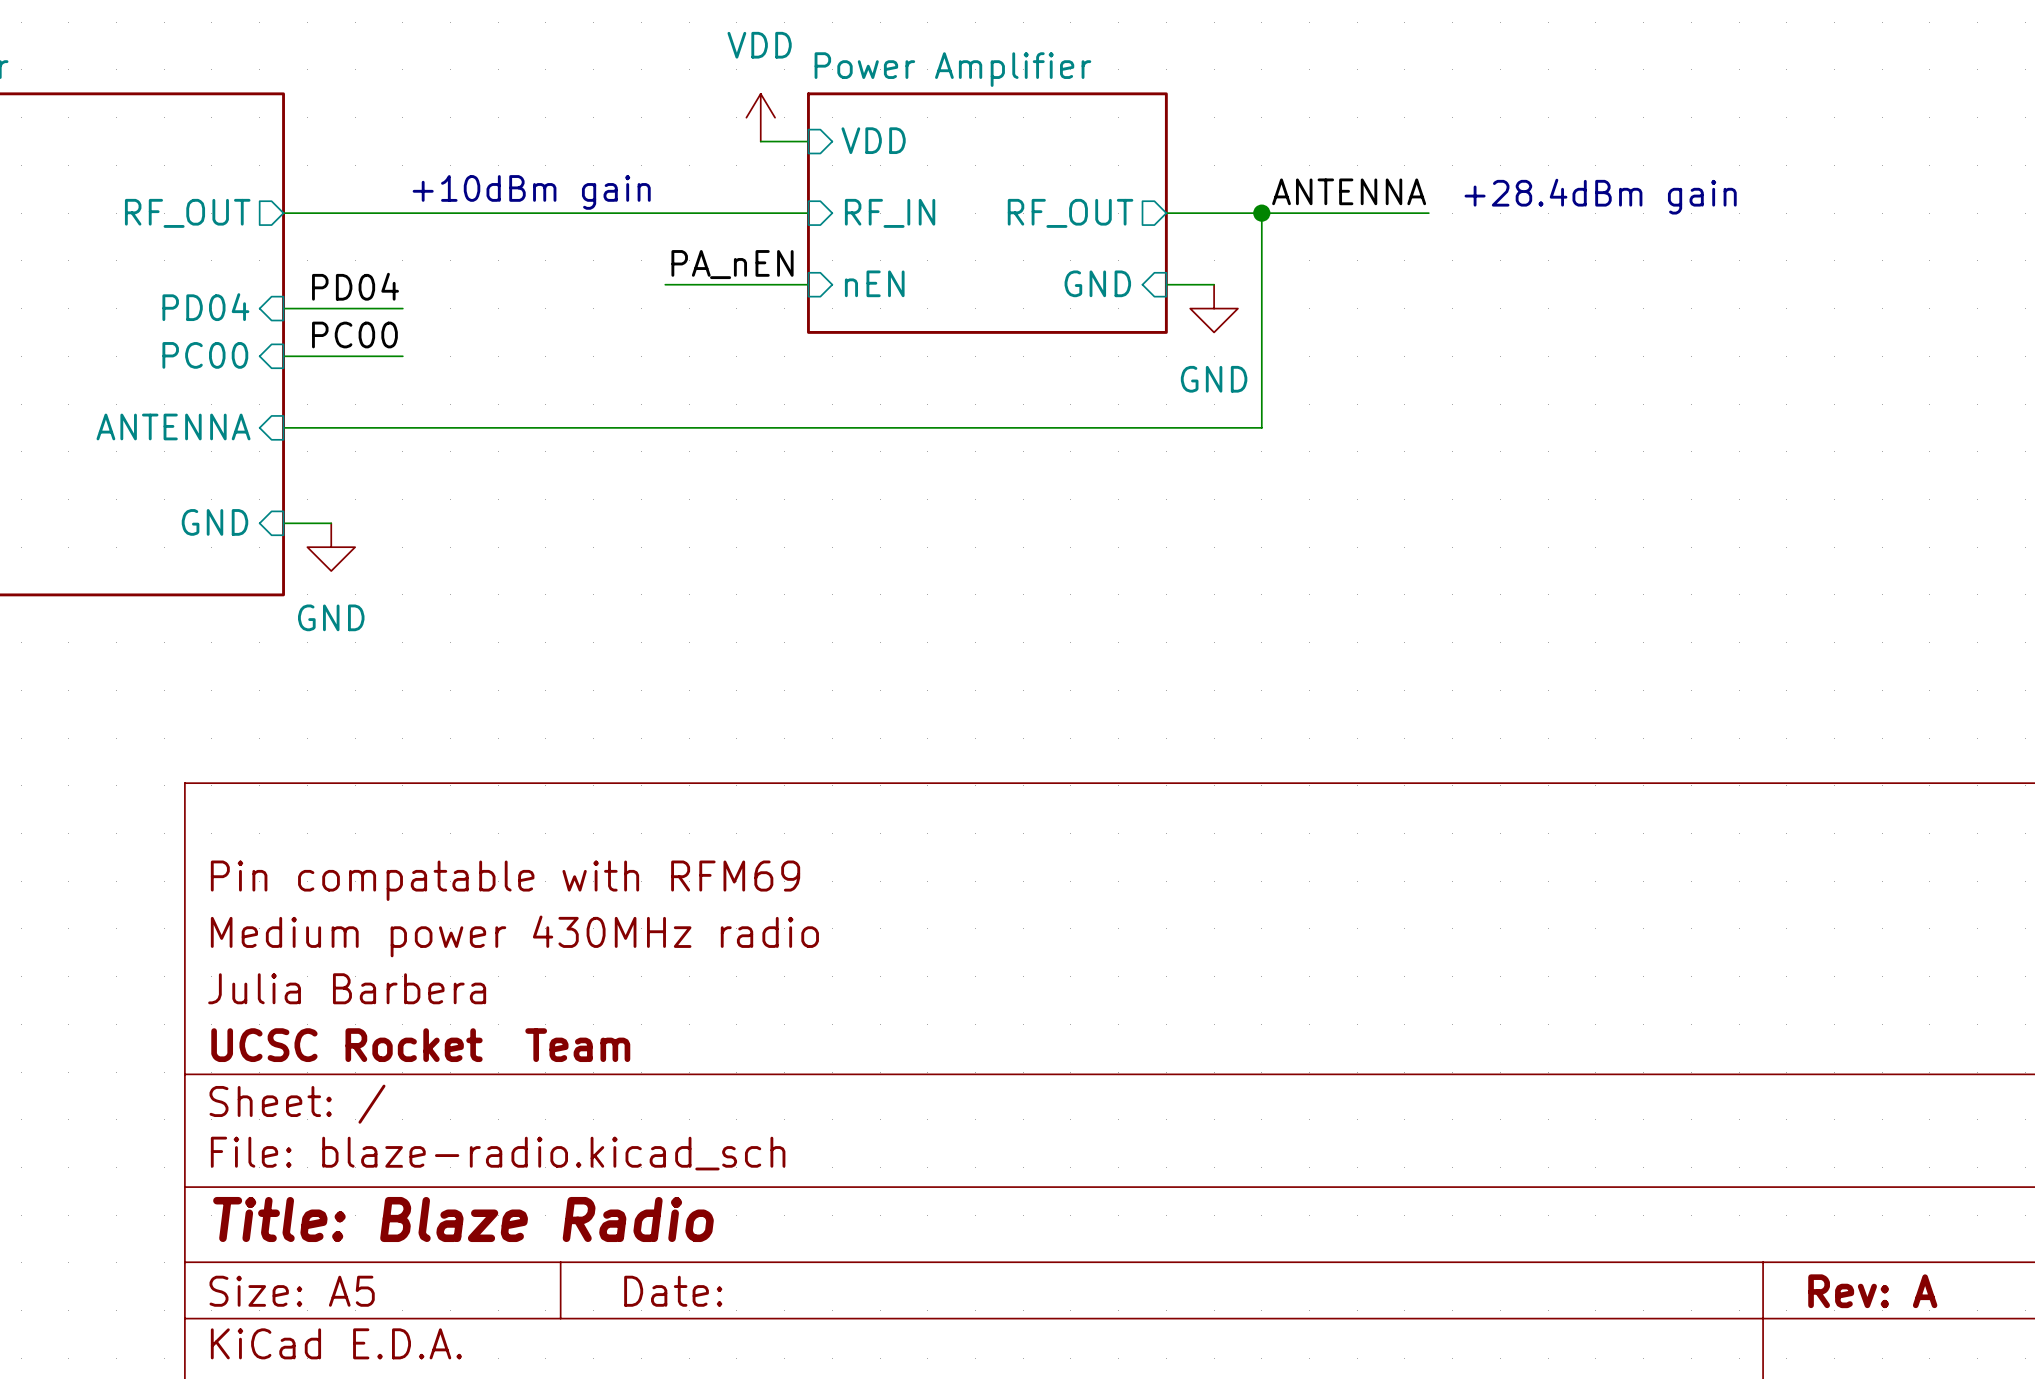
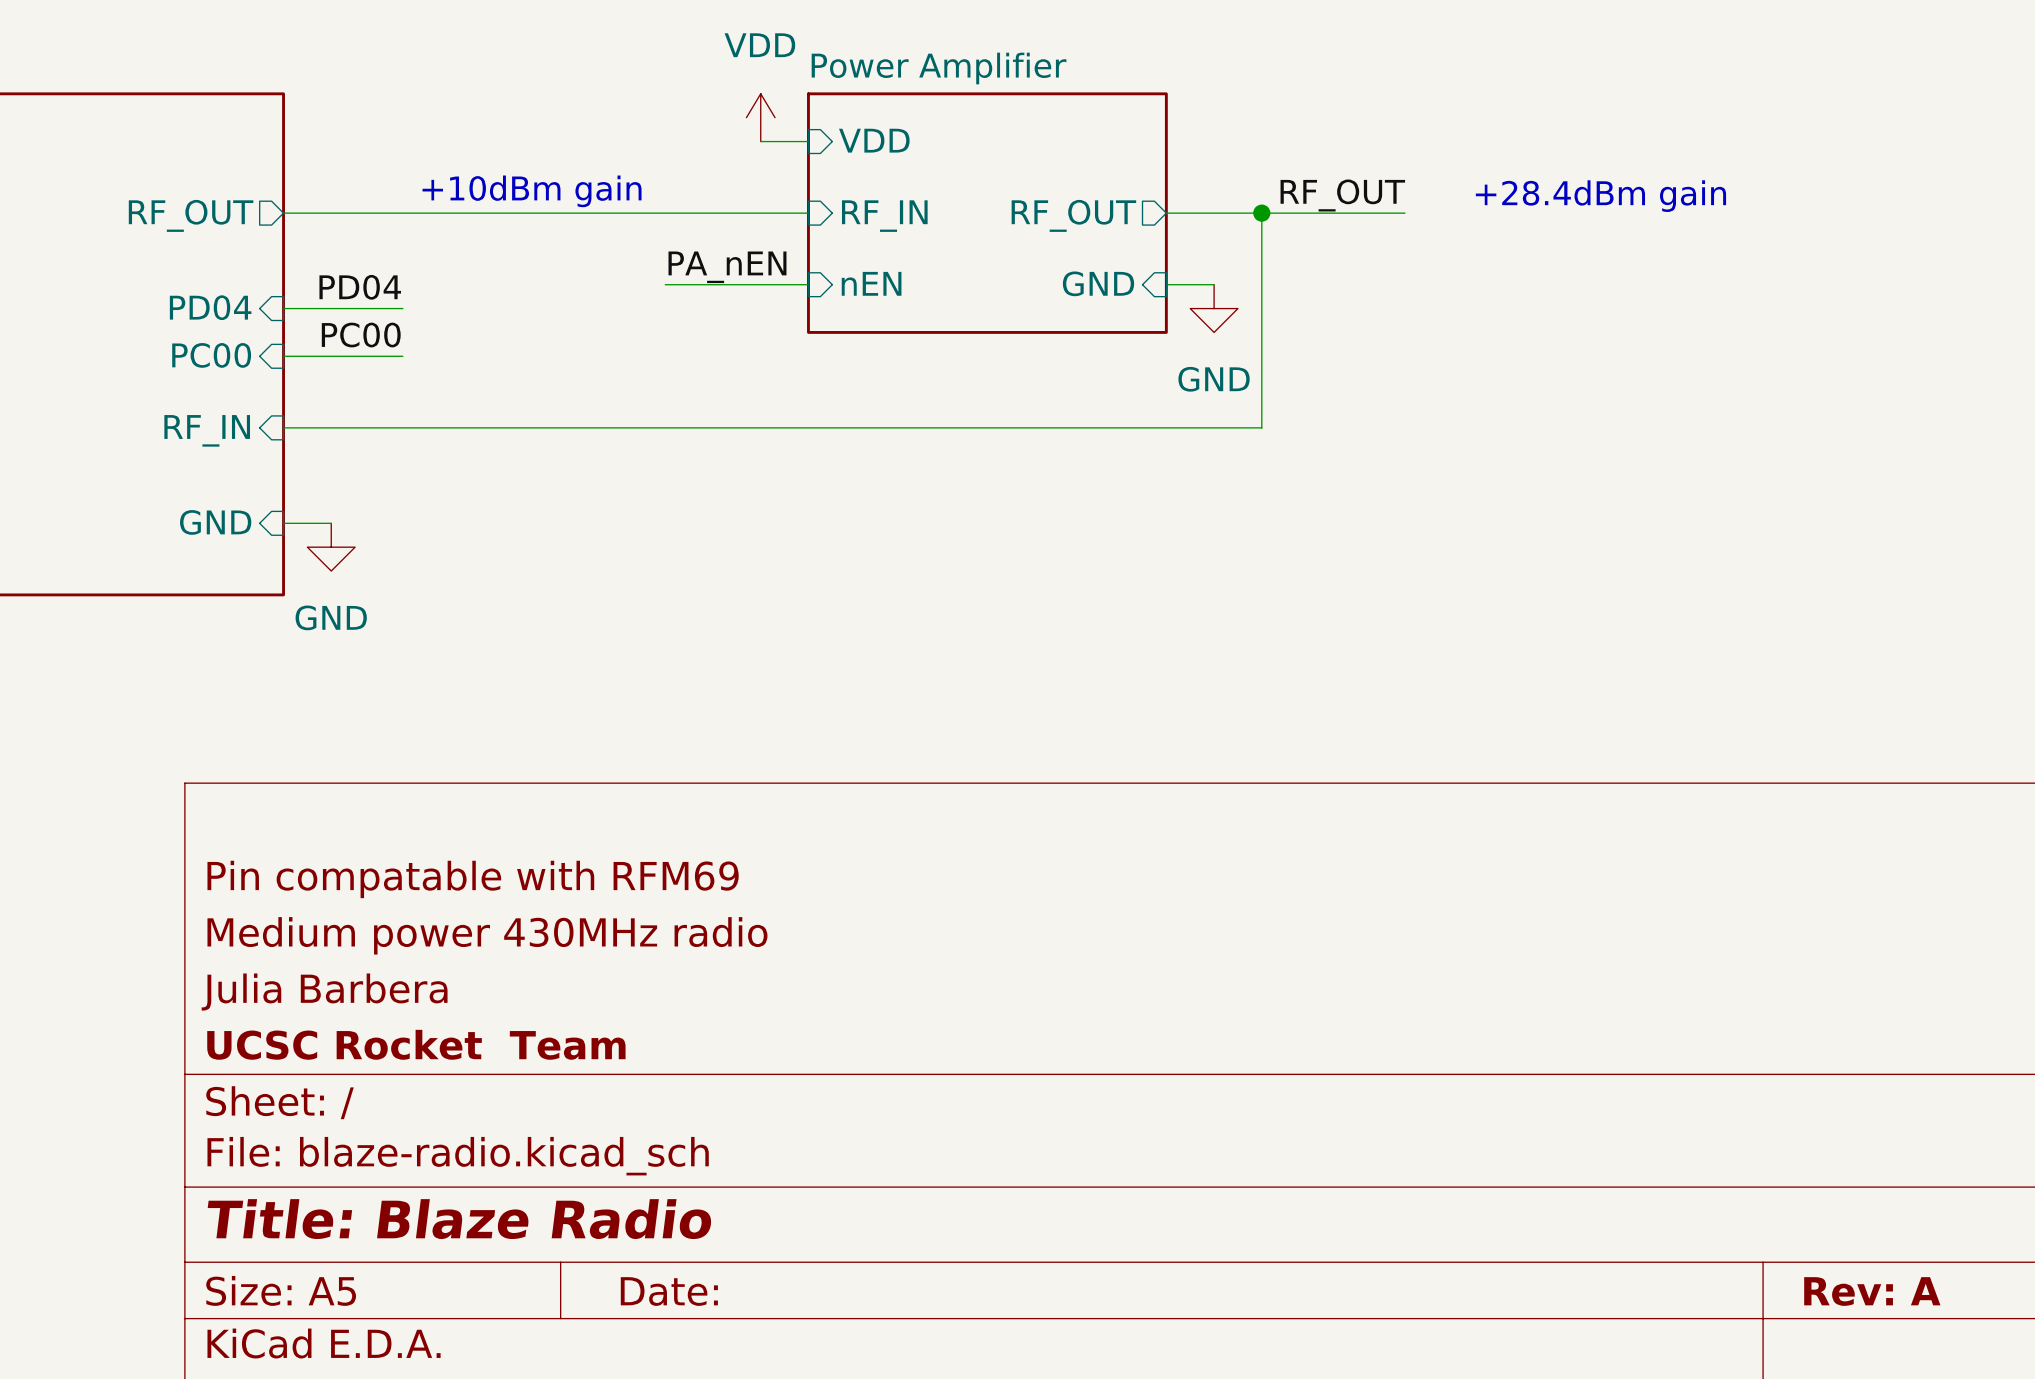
label: ANTENNA (1349, 191) -> none
label: none -> RF_OUT (1342, 195)
wire: (1404, 213) (1428, 213) -> none
sheet pin: ANTENNA (173, 426) -> RF_IN (207, 430)

